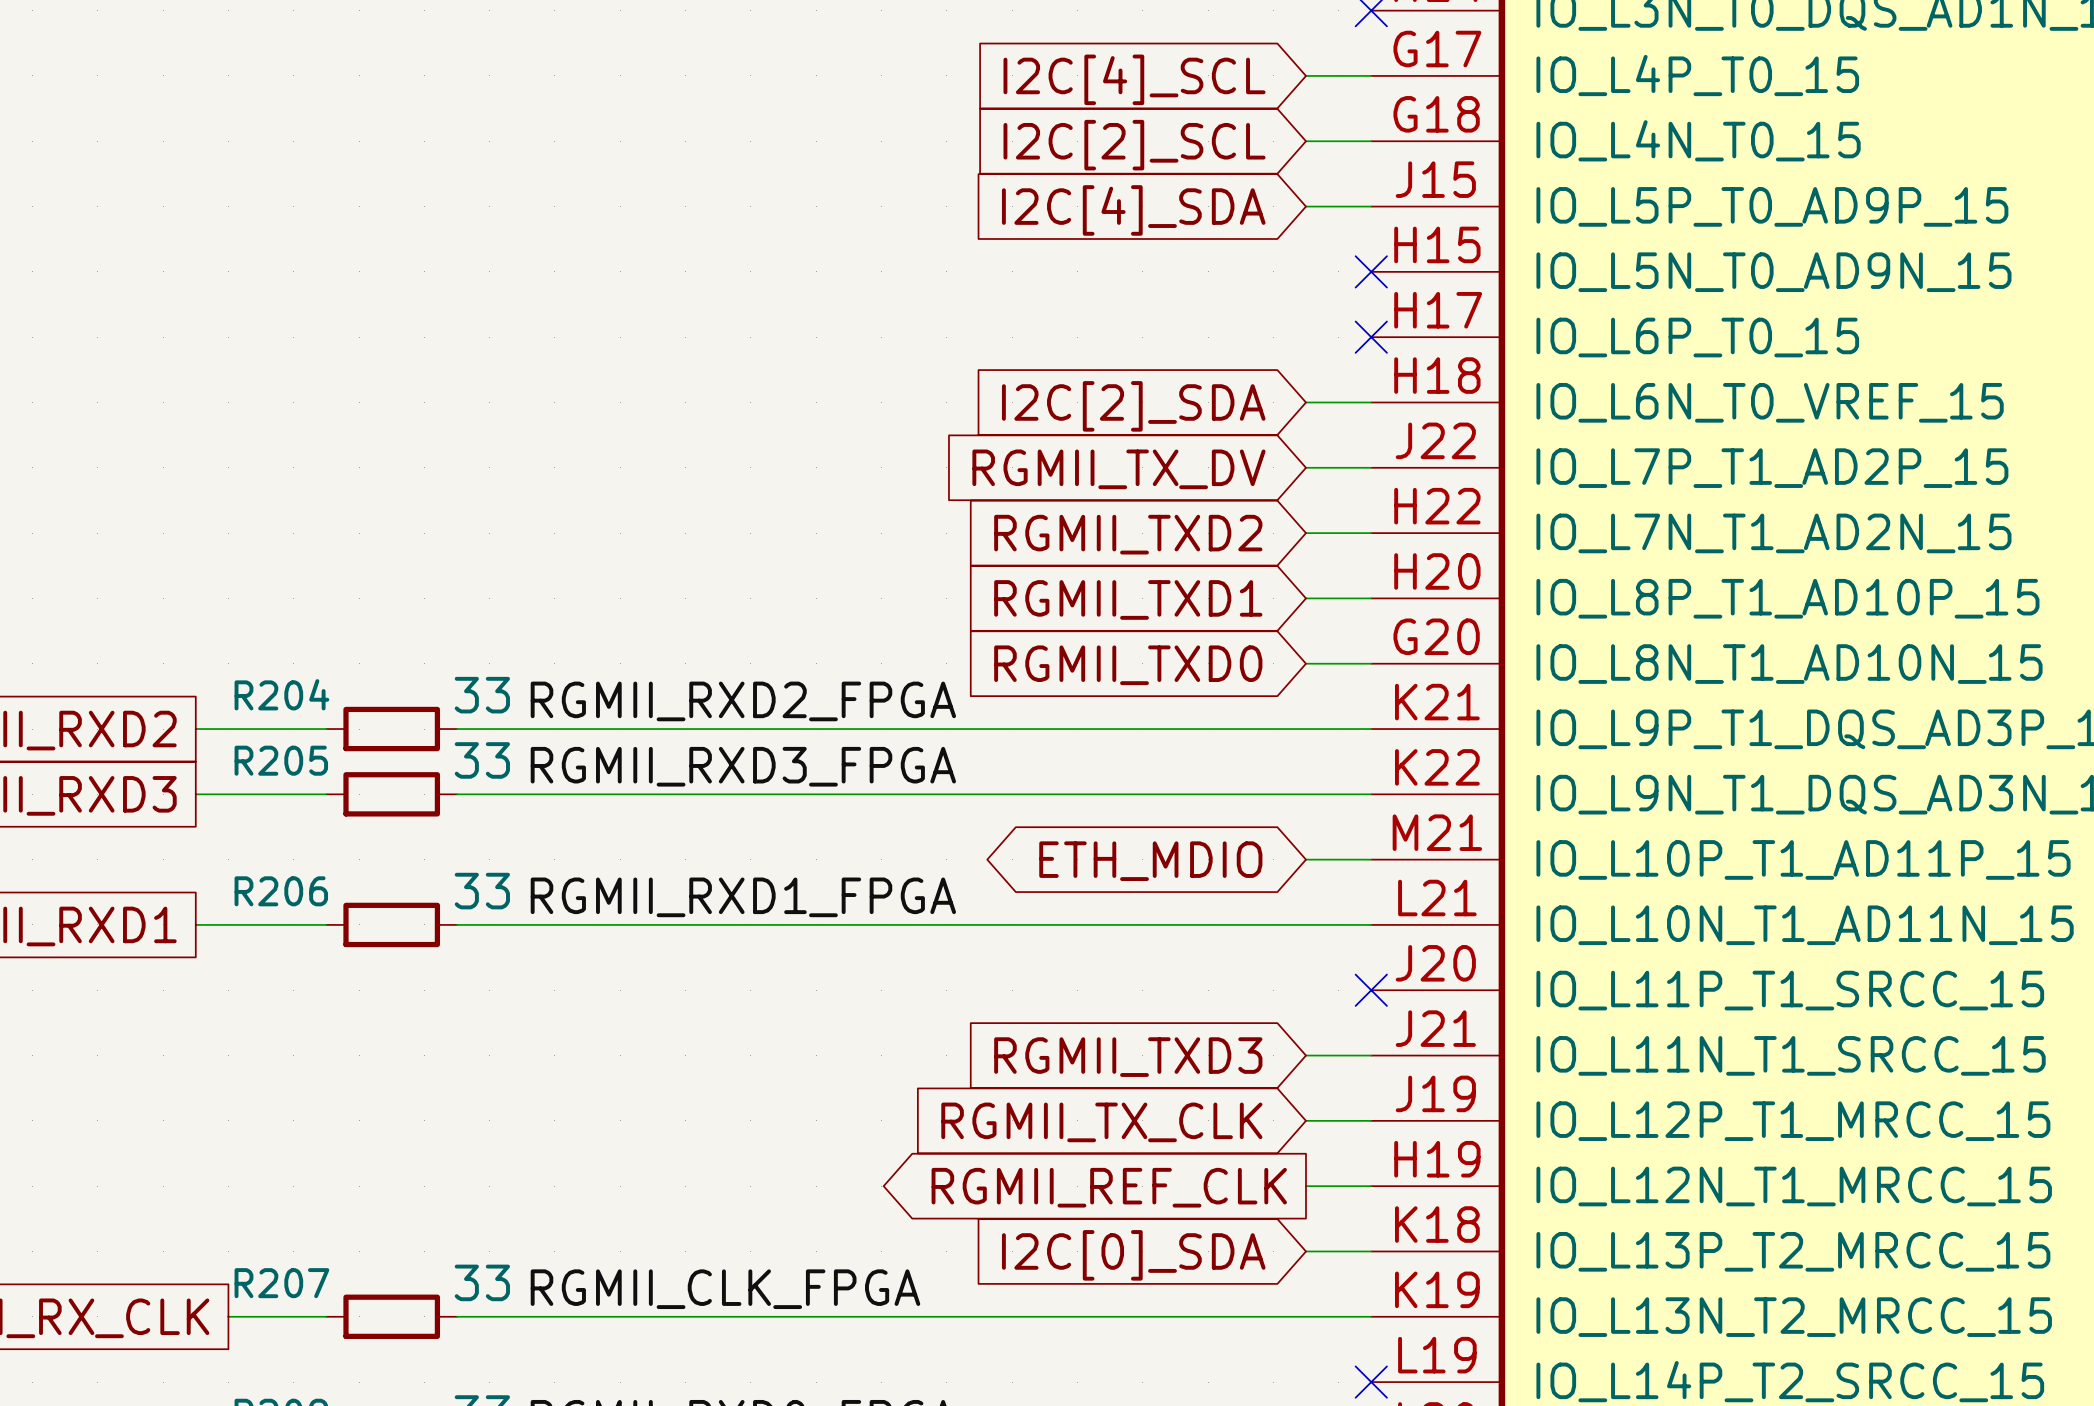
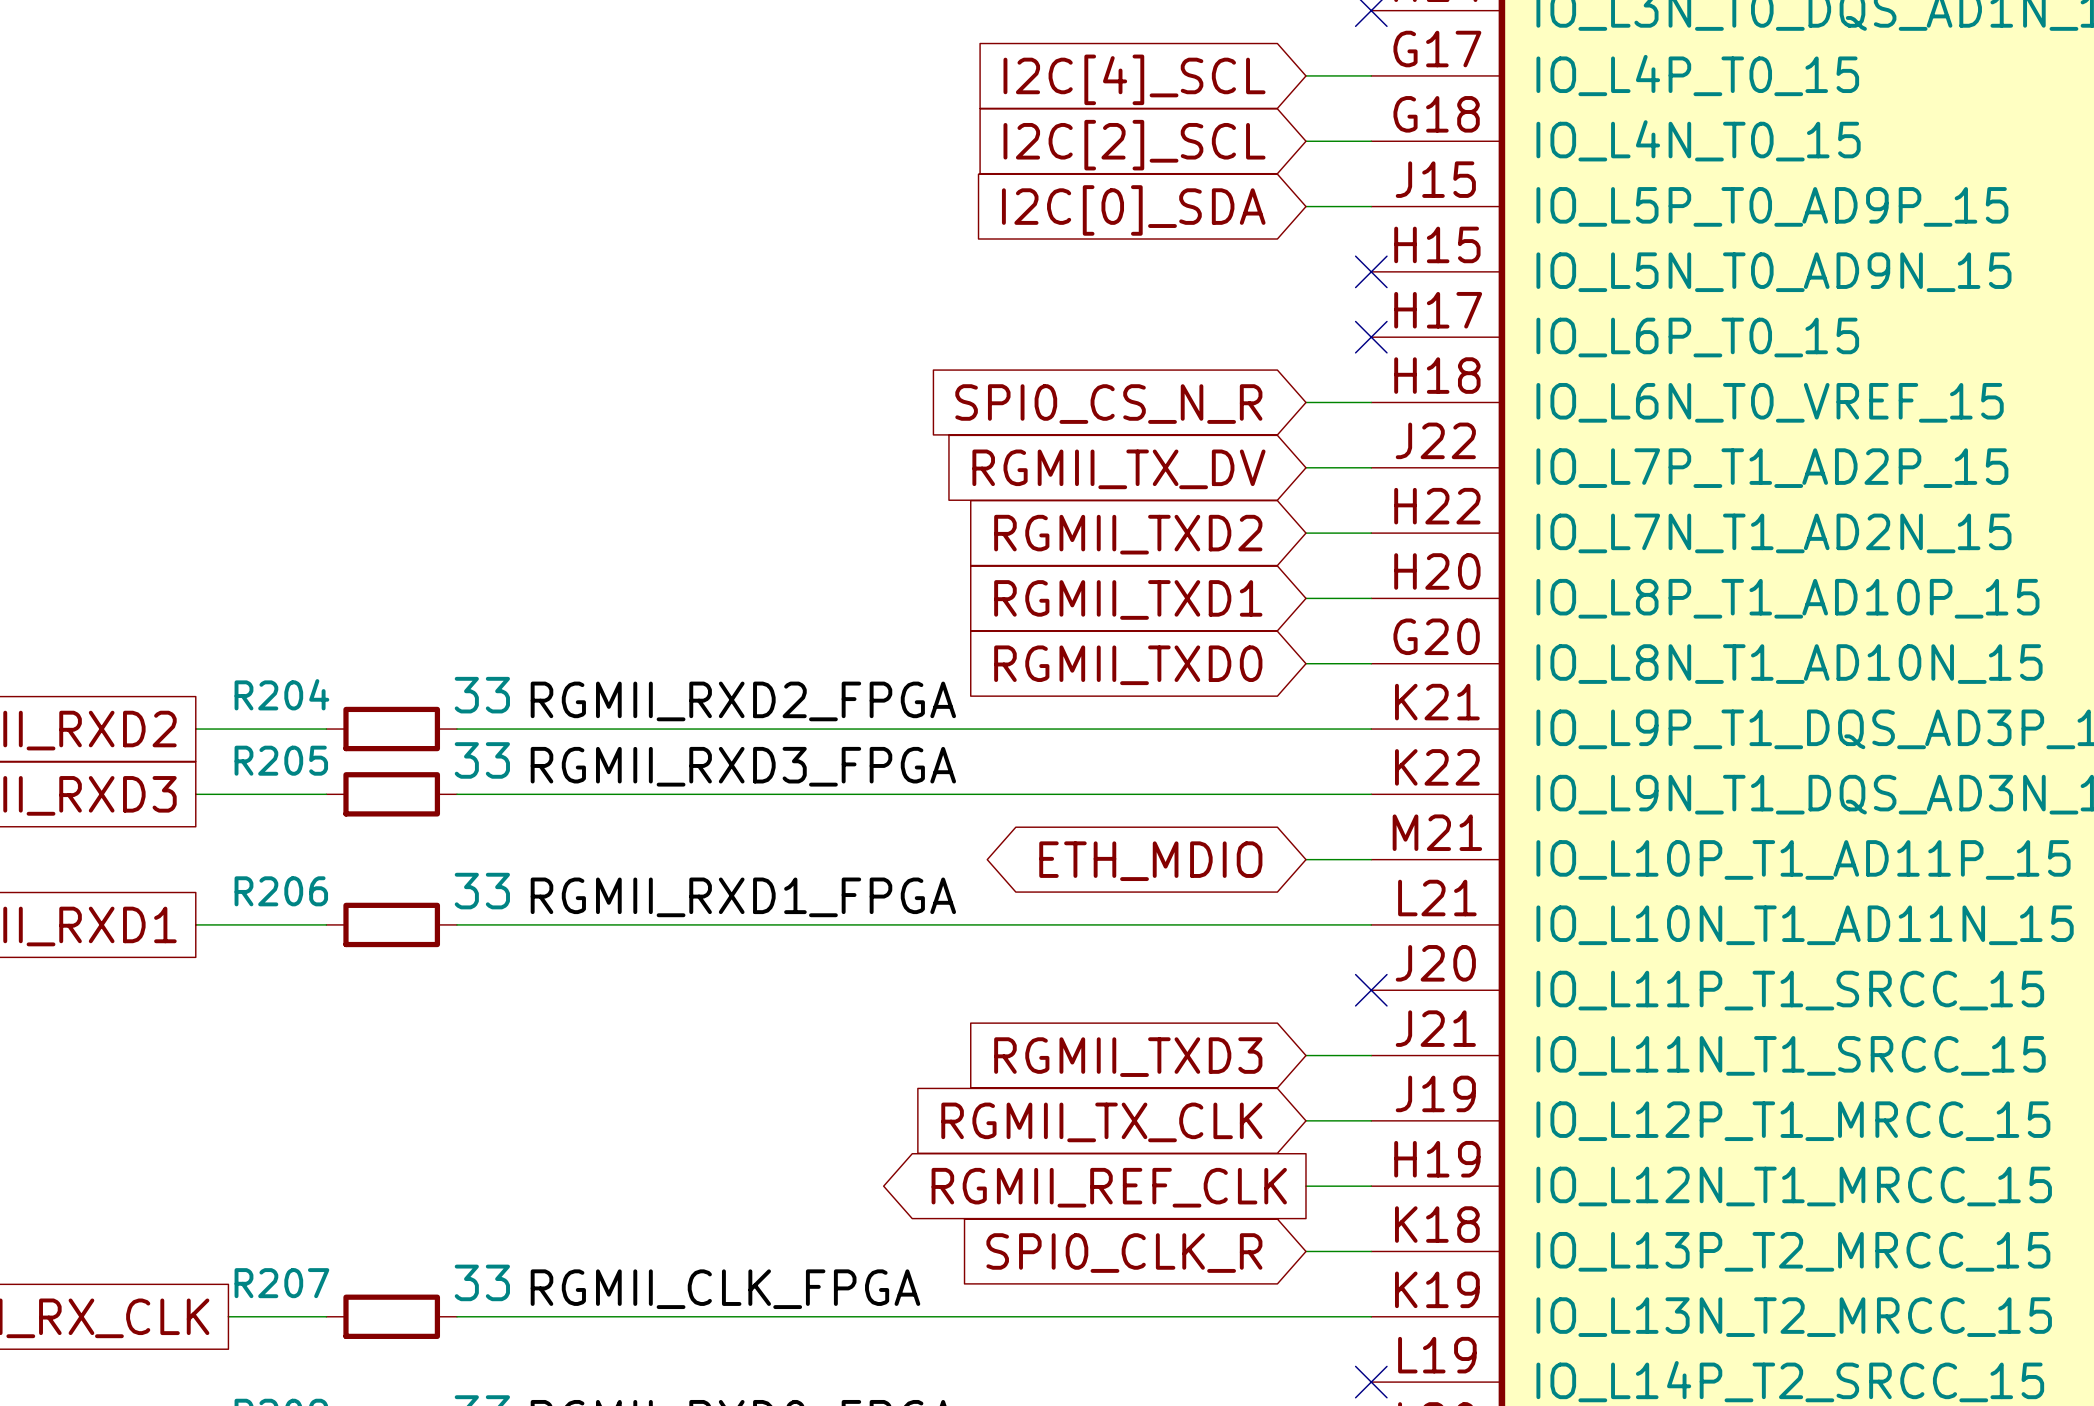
global label: I2C[4]_SDA (1133, 210) -> I2C[0]_SDA (1133, 210)
global label: I2C[2]_SDA (1133, 406) -> SPI0_CS_N_R (1108, 404)
global label: I2C[0]_SDA (1133, 1255) -> SPI0_CLK_R (1124, 1253)

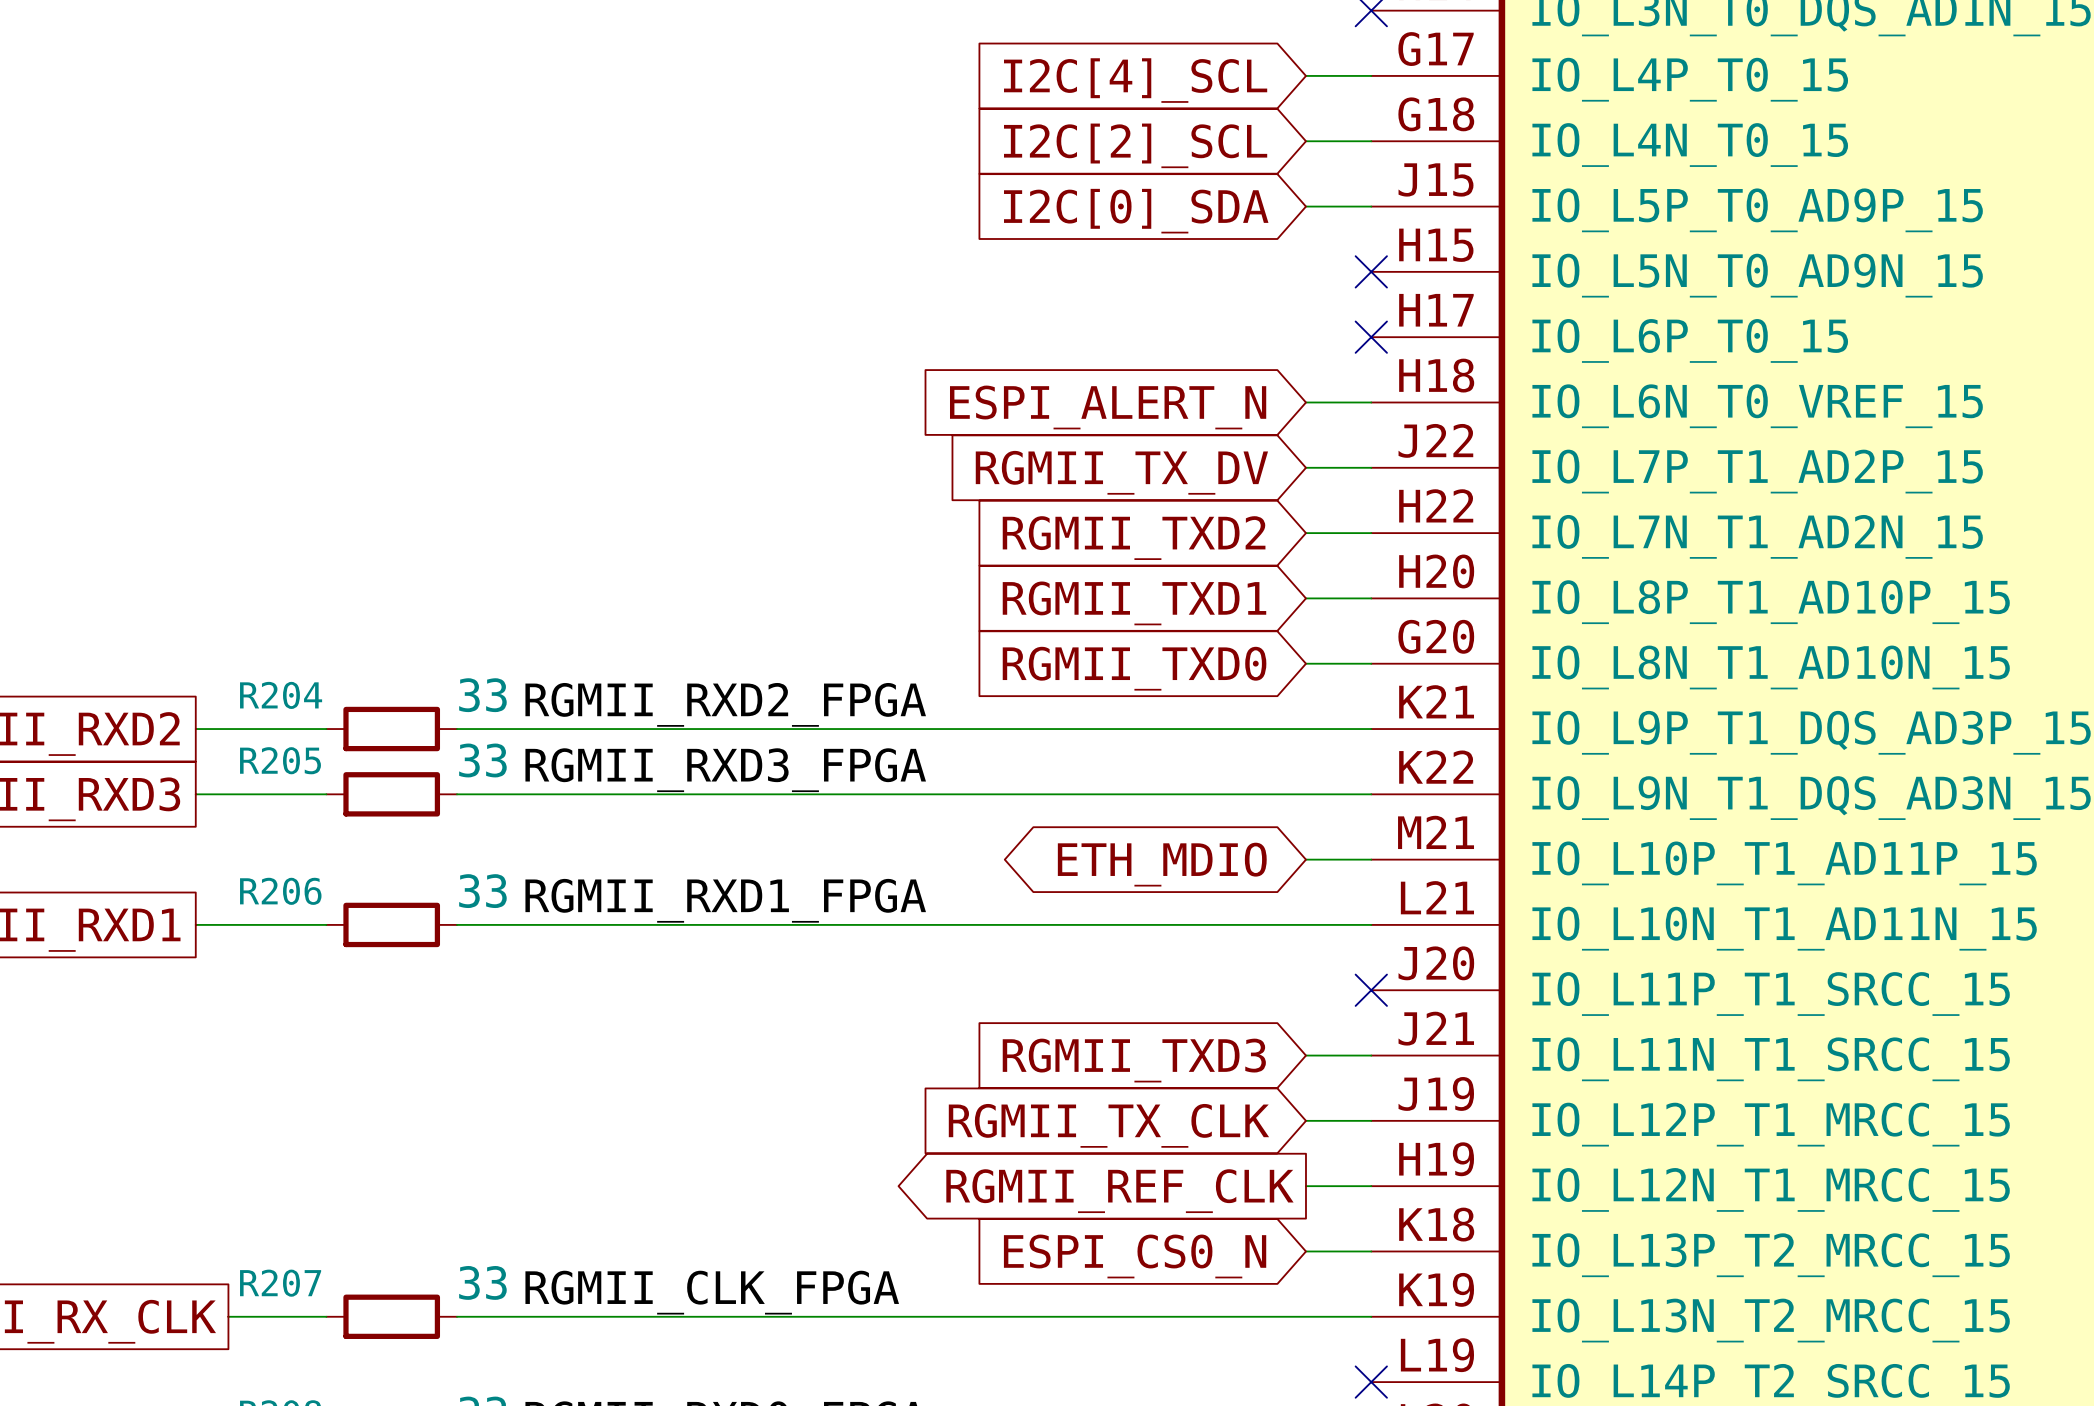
global label: SPI0_CS_N_R (1108, 404) -> ESPI_ALERT_N (1108, 407)
global label: SPI0_CLK_R (1124, 1253) -> ESPI_CS0_N (1135, 1256)

